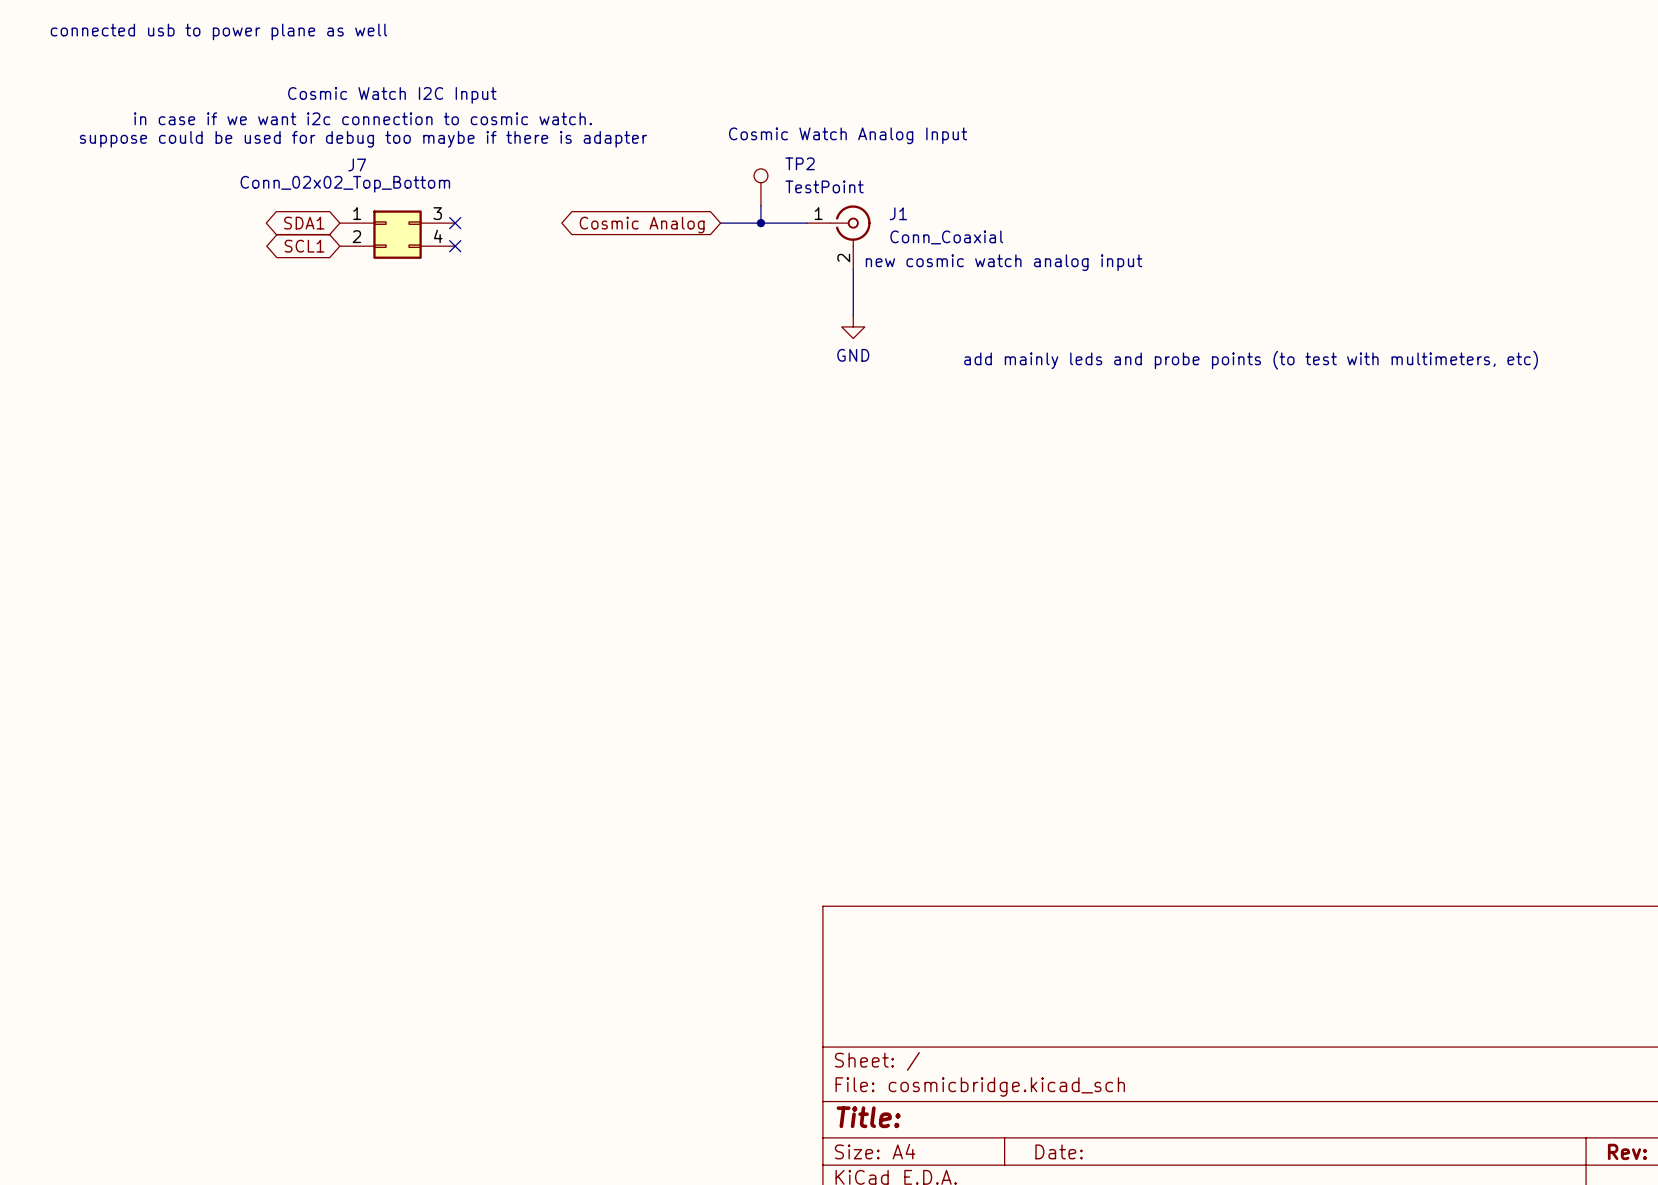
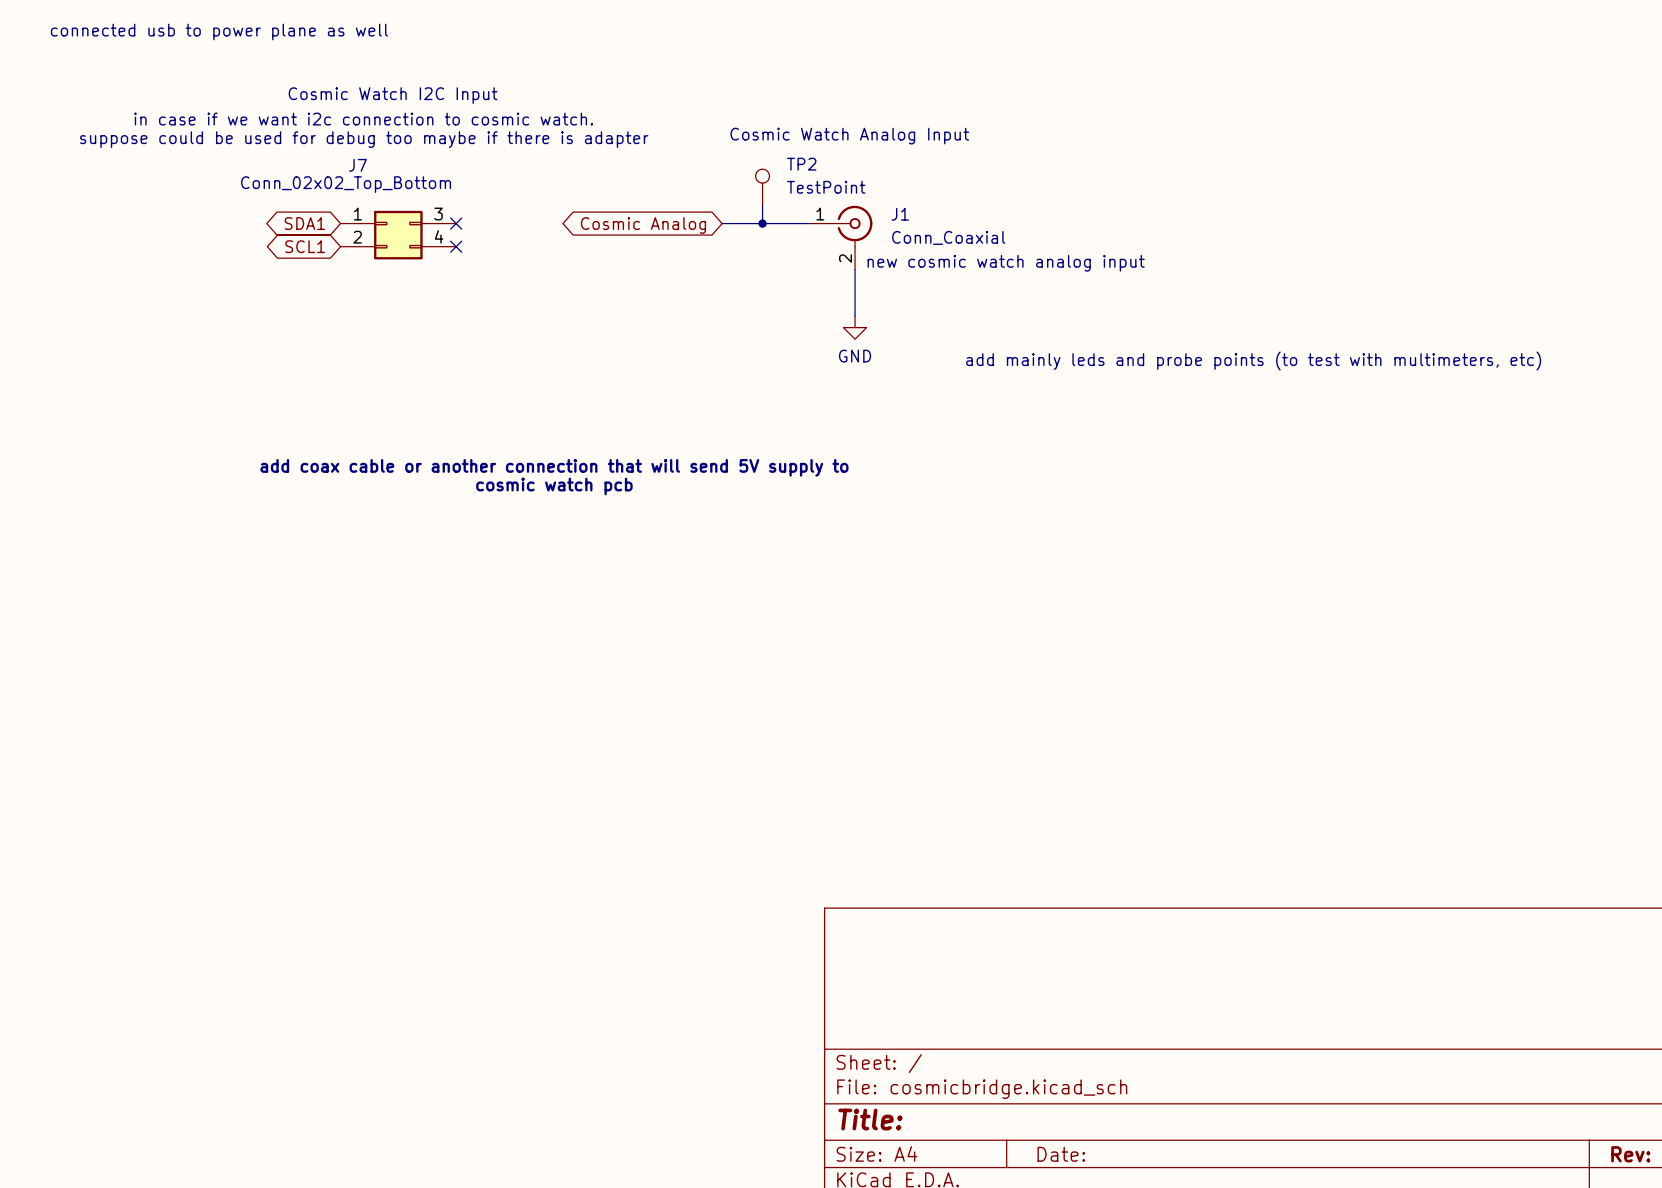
text: none -> add coax cable or another connection that will send 5V supply to (554, 467)
text: none -> cosmic watch pcb (554, 486)

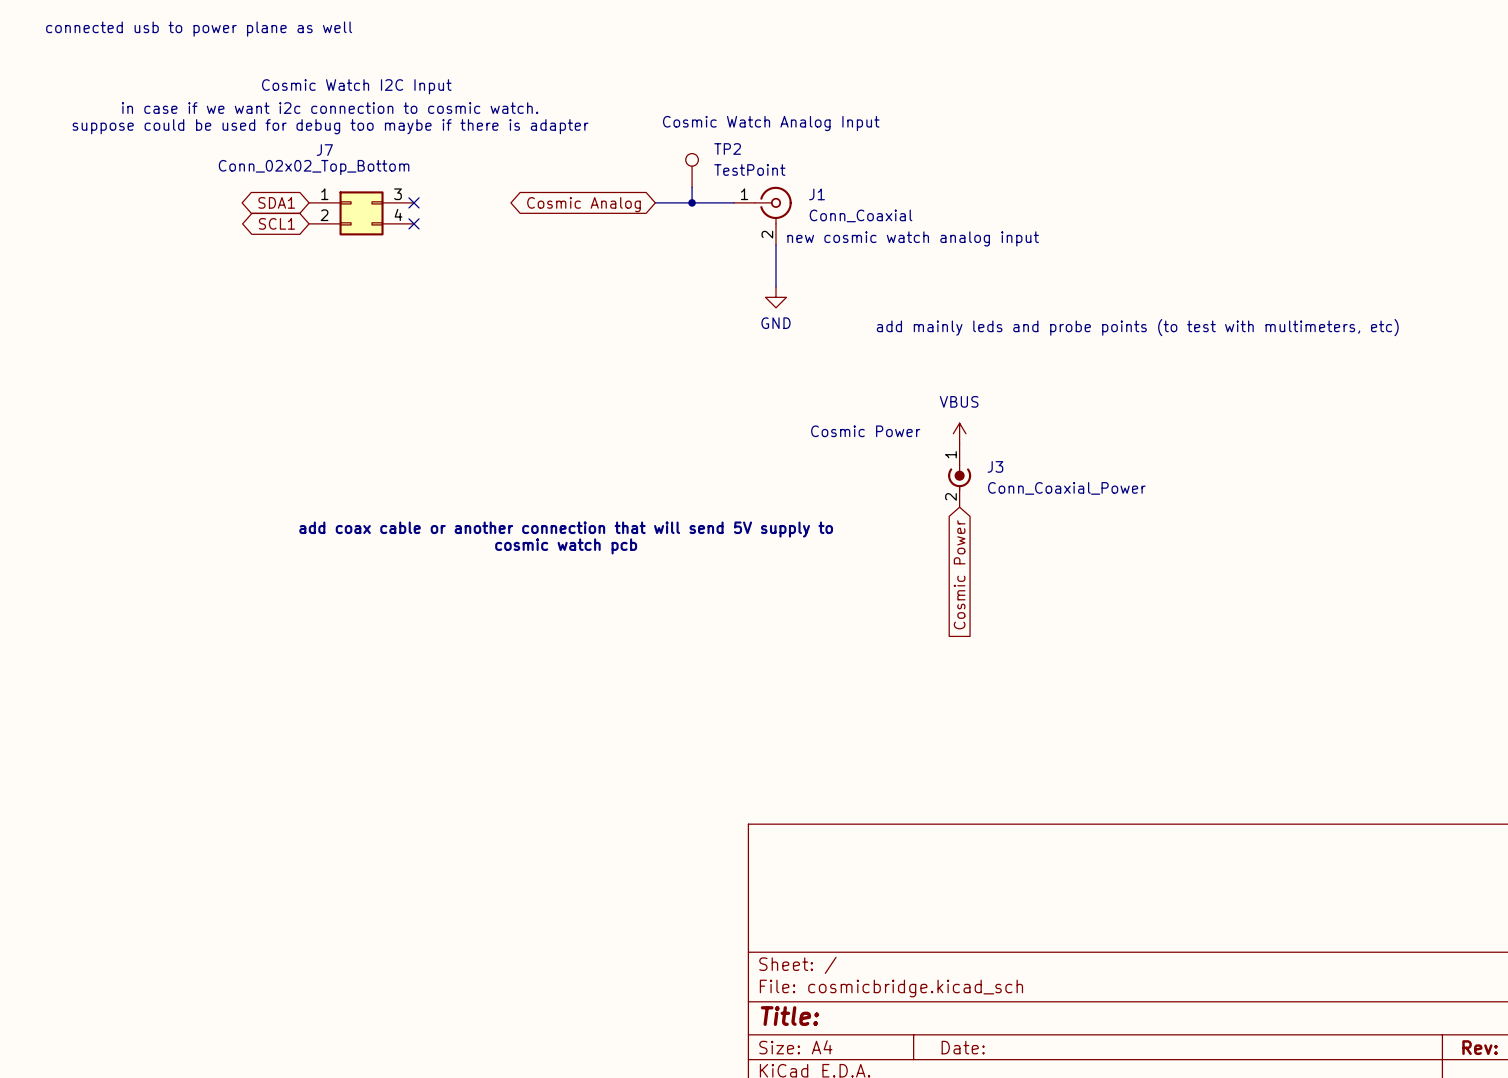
text position: add coax cable or another connection that will send 5V supply to (554, 467) -> add coax cable or another connection that will send 5V supply to (566, 529)
text: none -> Cosmic Power (865, 431)
power symbol: none -> VBUS (959, 433)
text position: cosmic watch pcb (554, 486) -> cosmic watch pcb (566, 546)
J3: none -> Conn_Coaxial_Power (959, 475)
global label: none -> Cosmic Power (959, 574)

